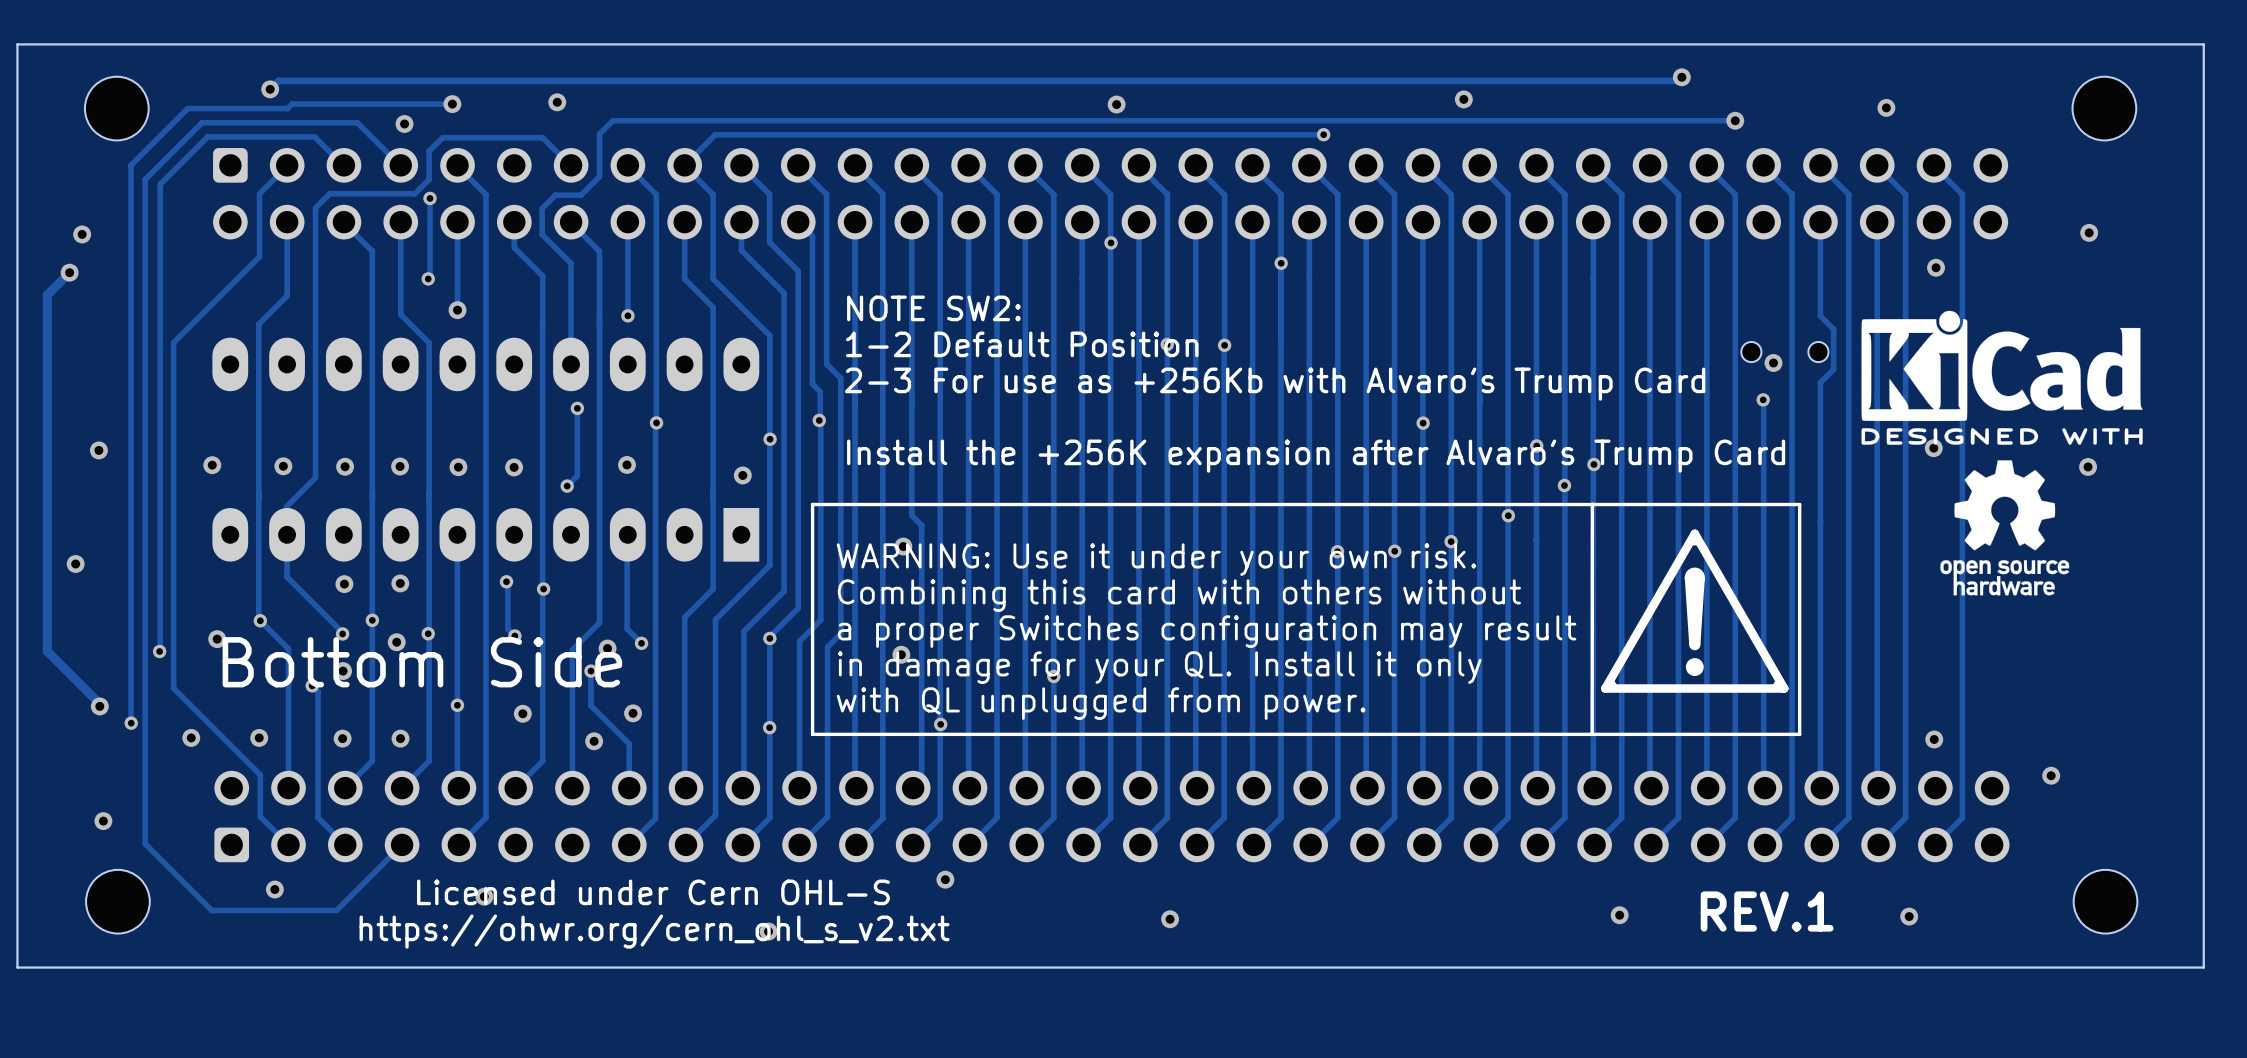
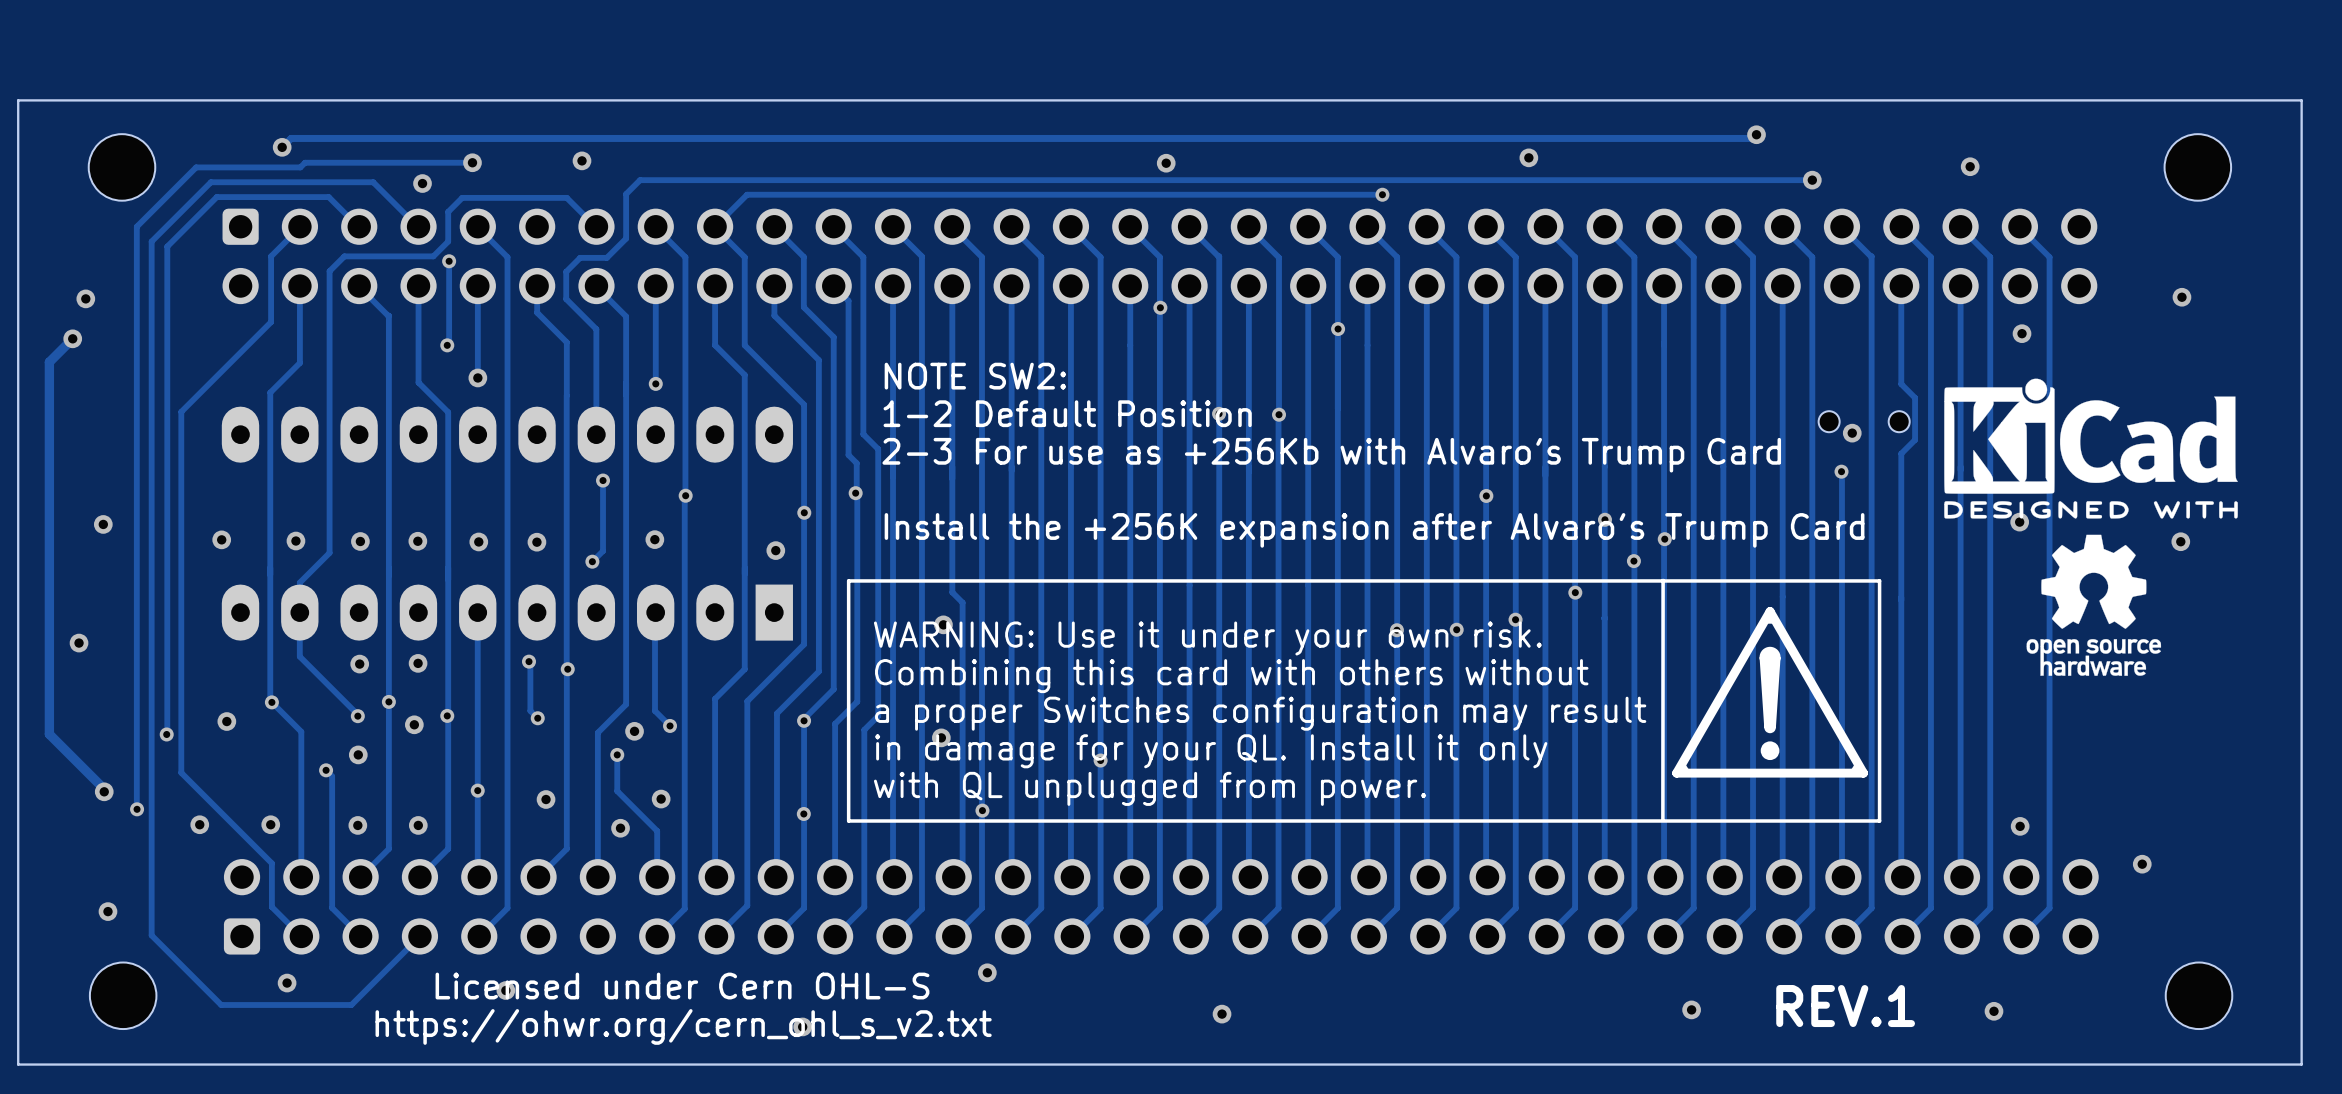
text: Bottom Side (422, 662) -> none

